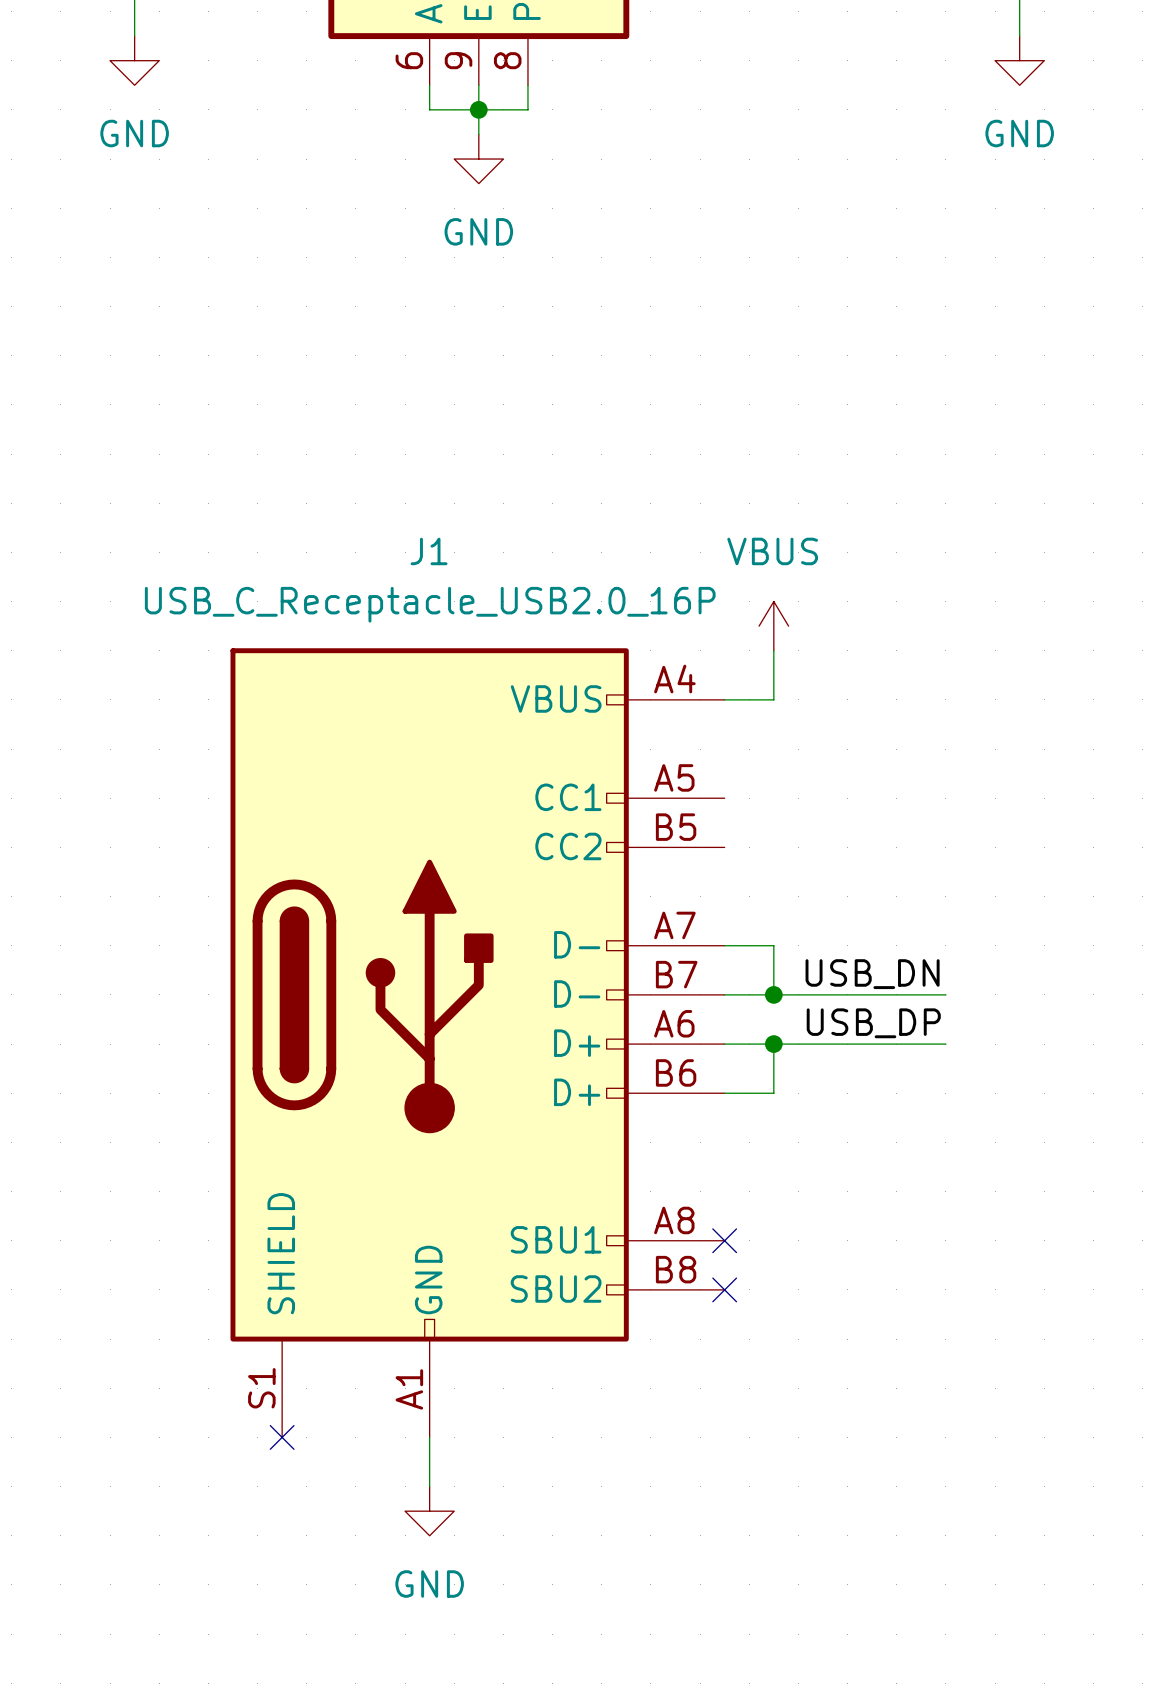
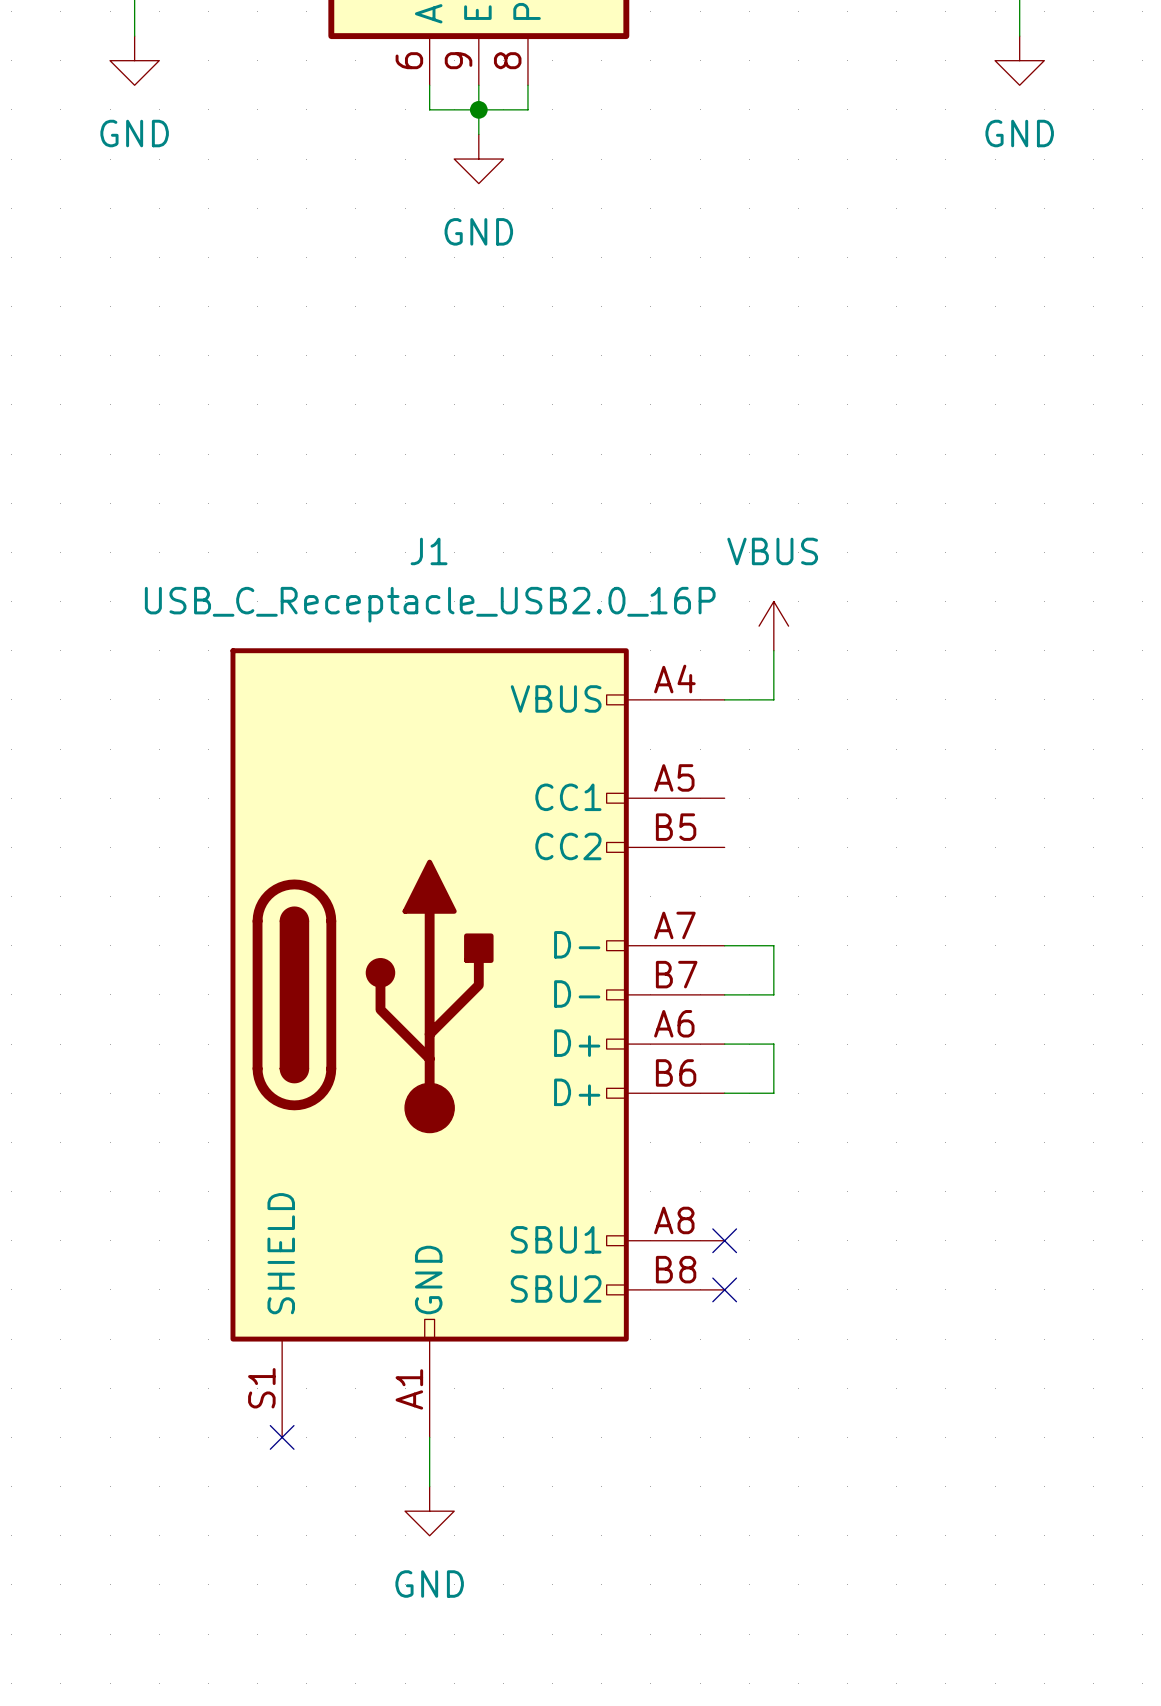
label: USB_DN (872, 974) -> none
wire: (773, 994) (945, 994) -> none
junction: (773, 994) -> none
label: USB_DP (873, 1023) -> none
wire: (773, 1044) (945, 1044) -> none
junction: (773, 1044) -> none

